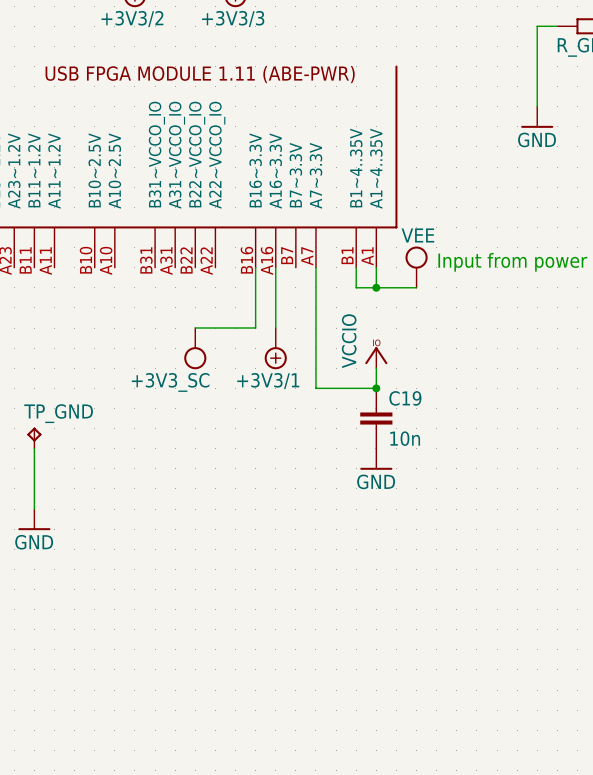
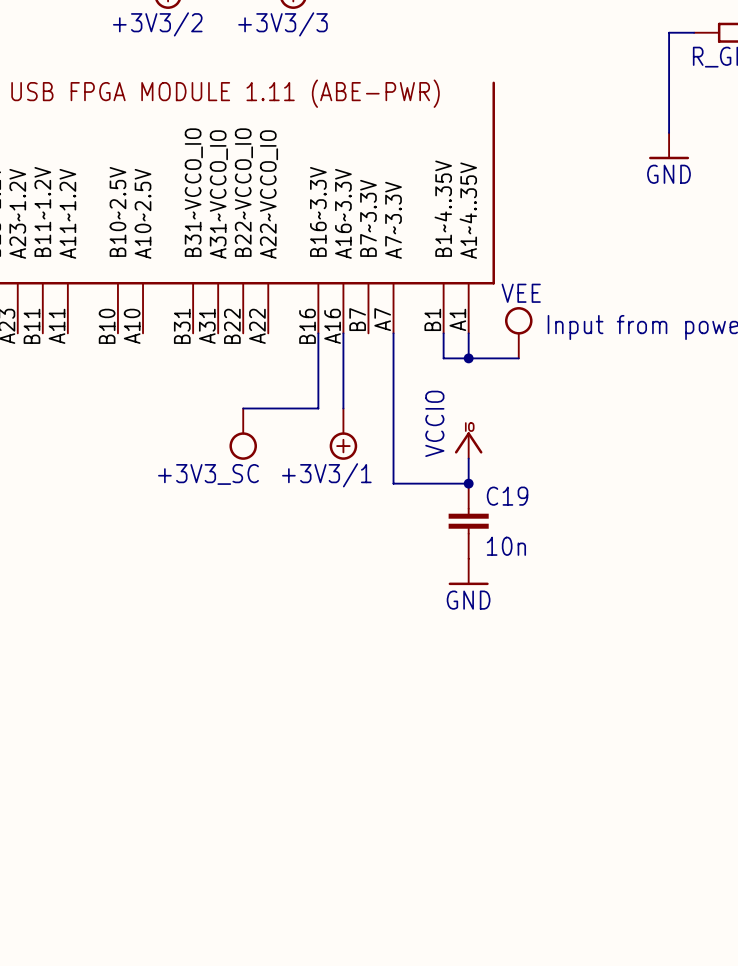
TP_GND: (34, 438) -> none
wire: (34, 448) (34, 509) -> none
power symbol: GND (34, 519) -> none

